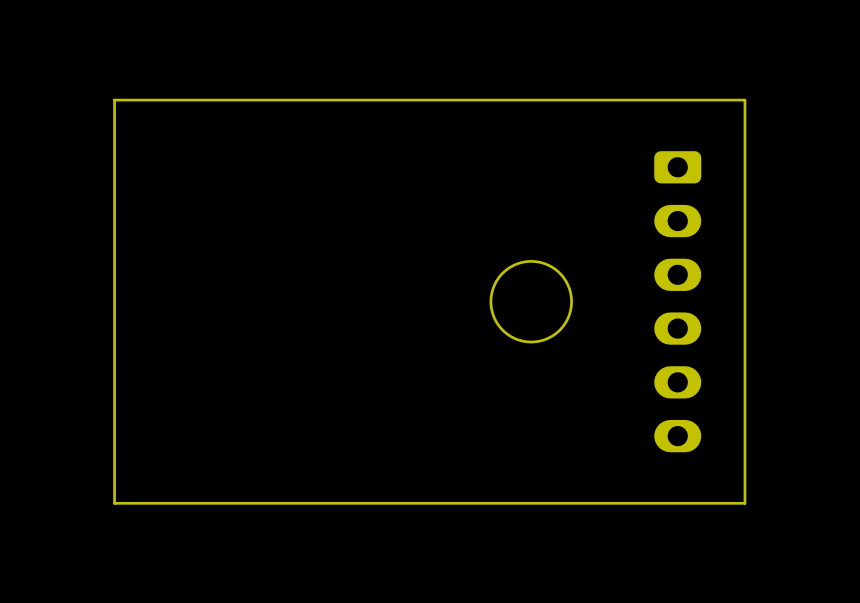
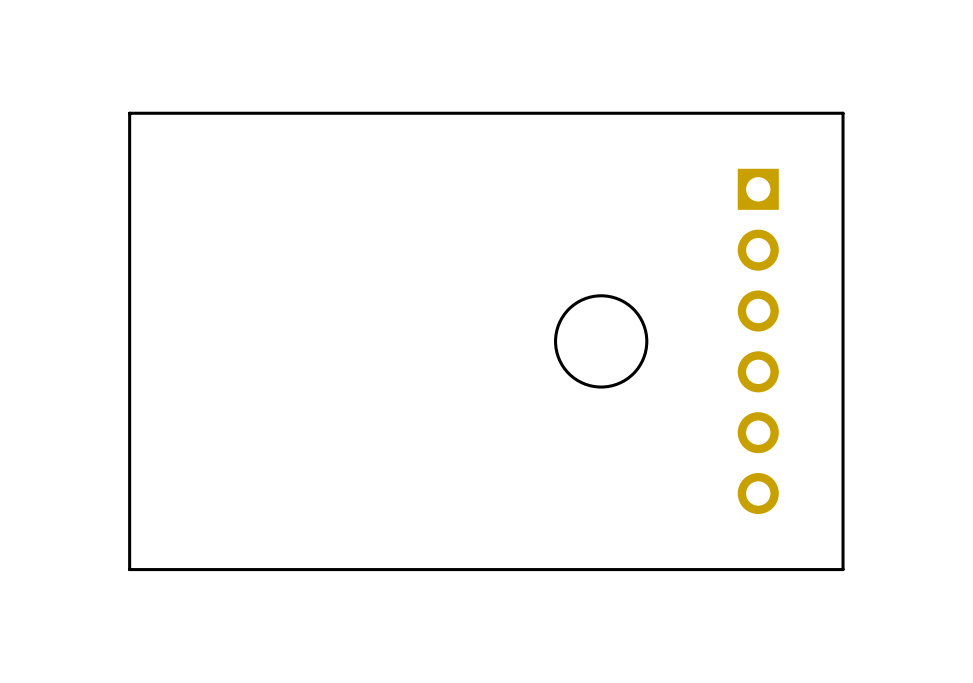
part footprint: [654, 151, 702, 453] -> [737, 168, 779, 515]

